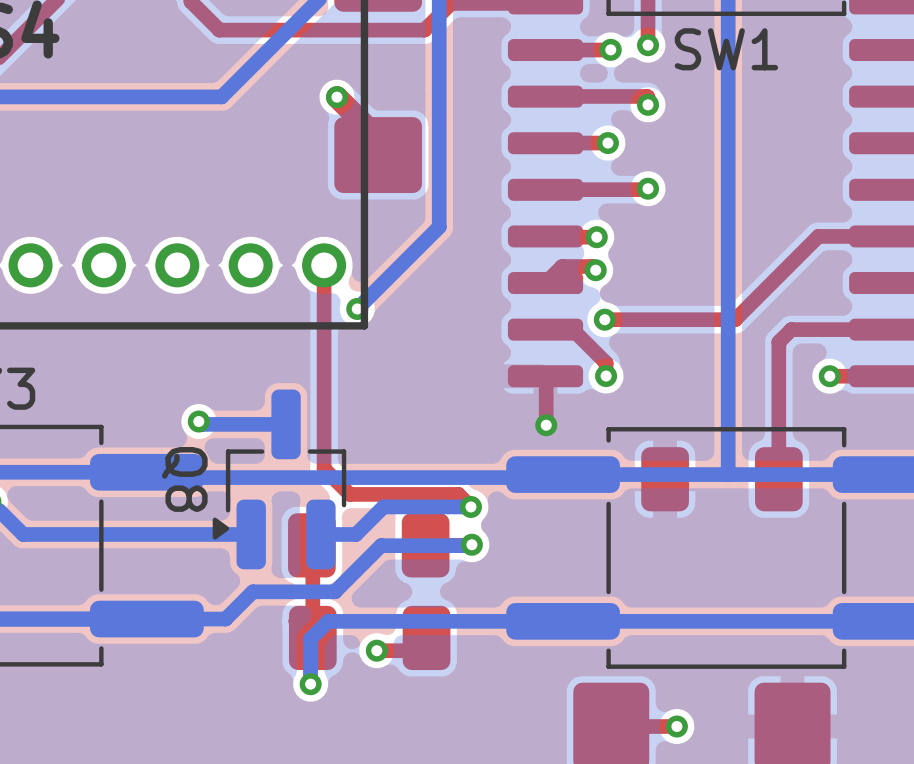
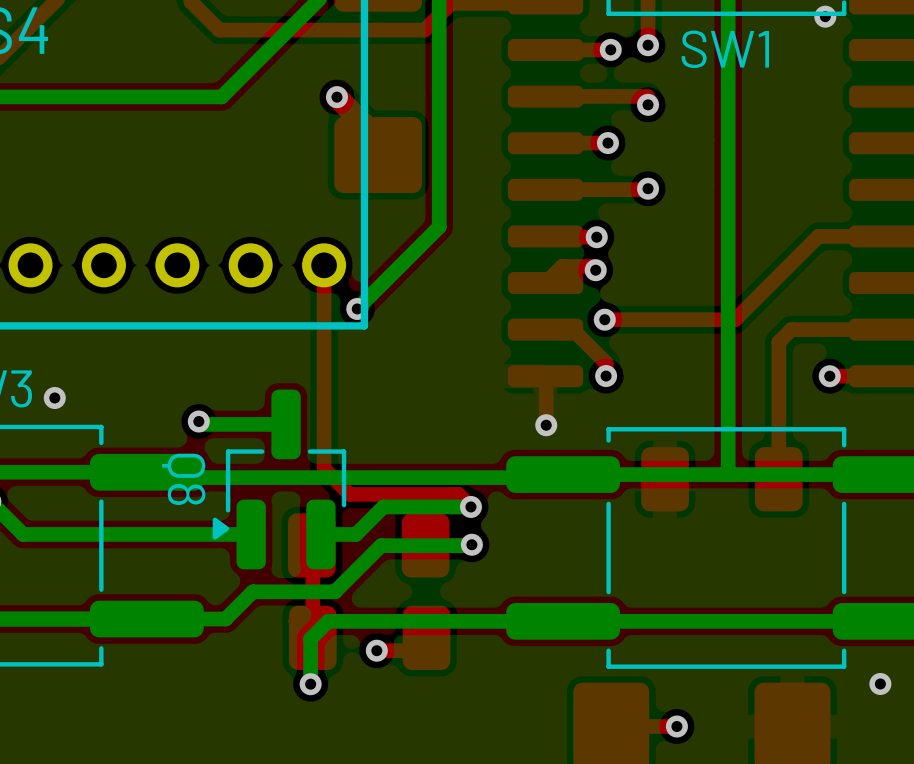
via: none -> (825, 16)
via: none -> (54, 398)
via: none -> (880, 683)

